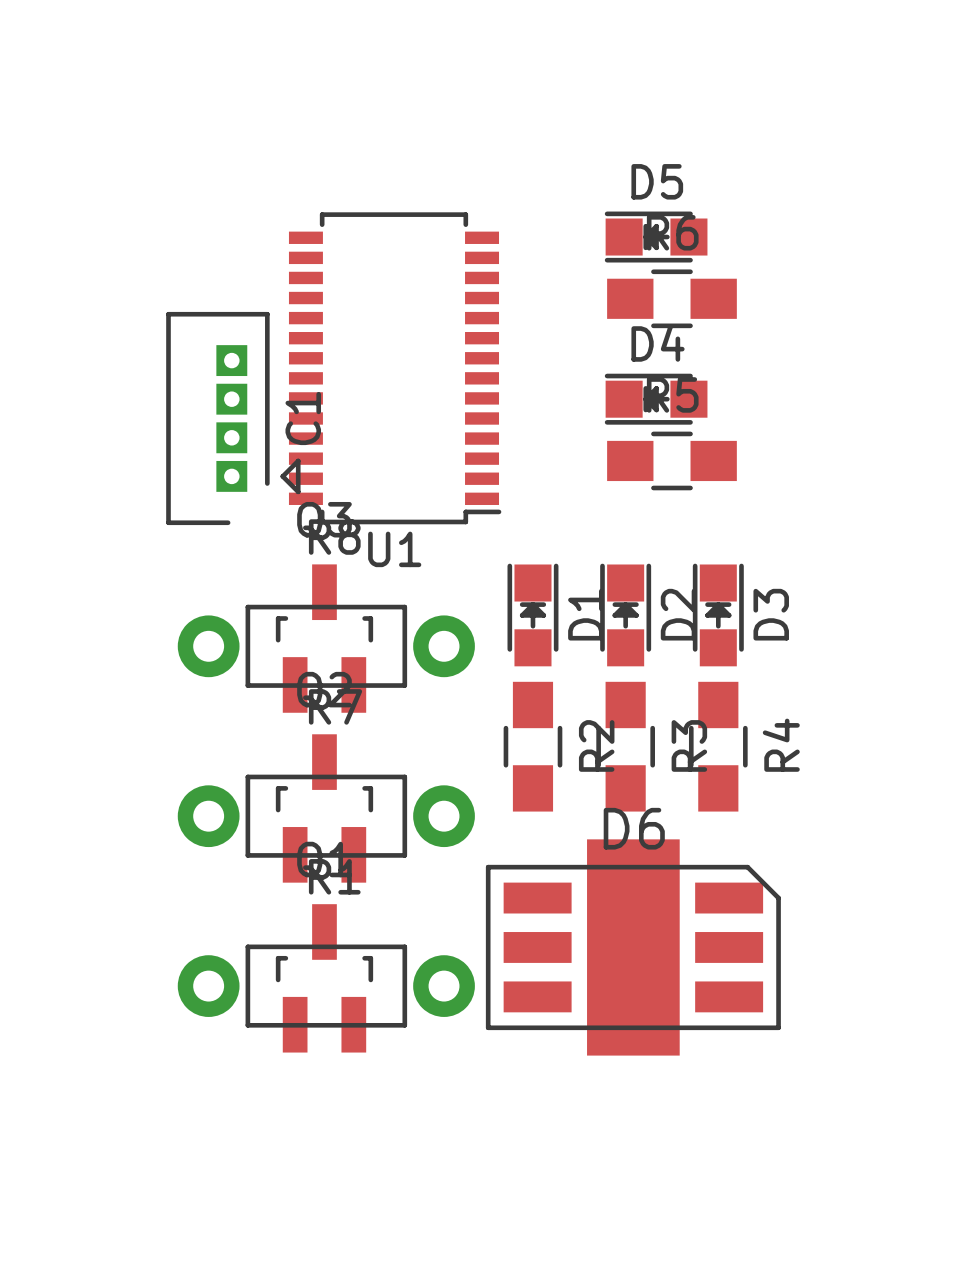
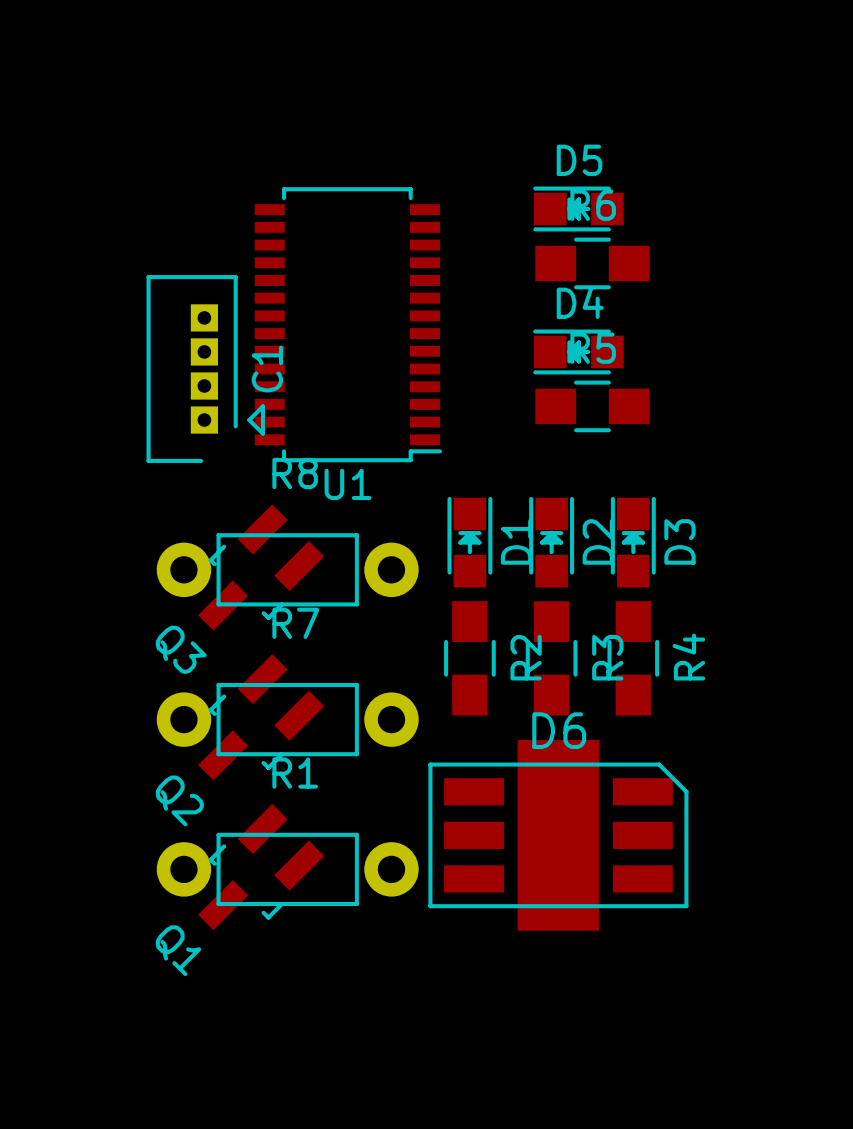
Q3 rotation: 0° (324, 638) -> 135° counterclockwise (261, 567)
Q2 rotation: 0° (324, 808) -> 135° counterclockwise (261, 717)
Q1 rotation: 0° (324, 978) -> 135° counterclockwise (261, 867)

